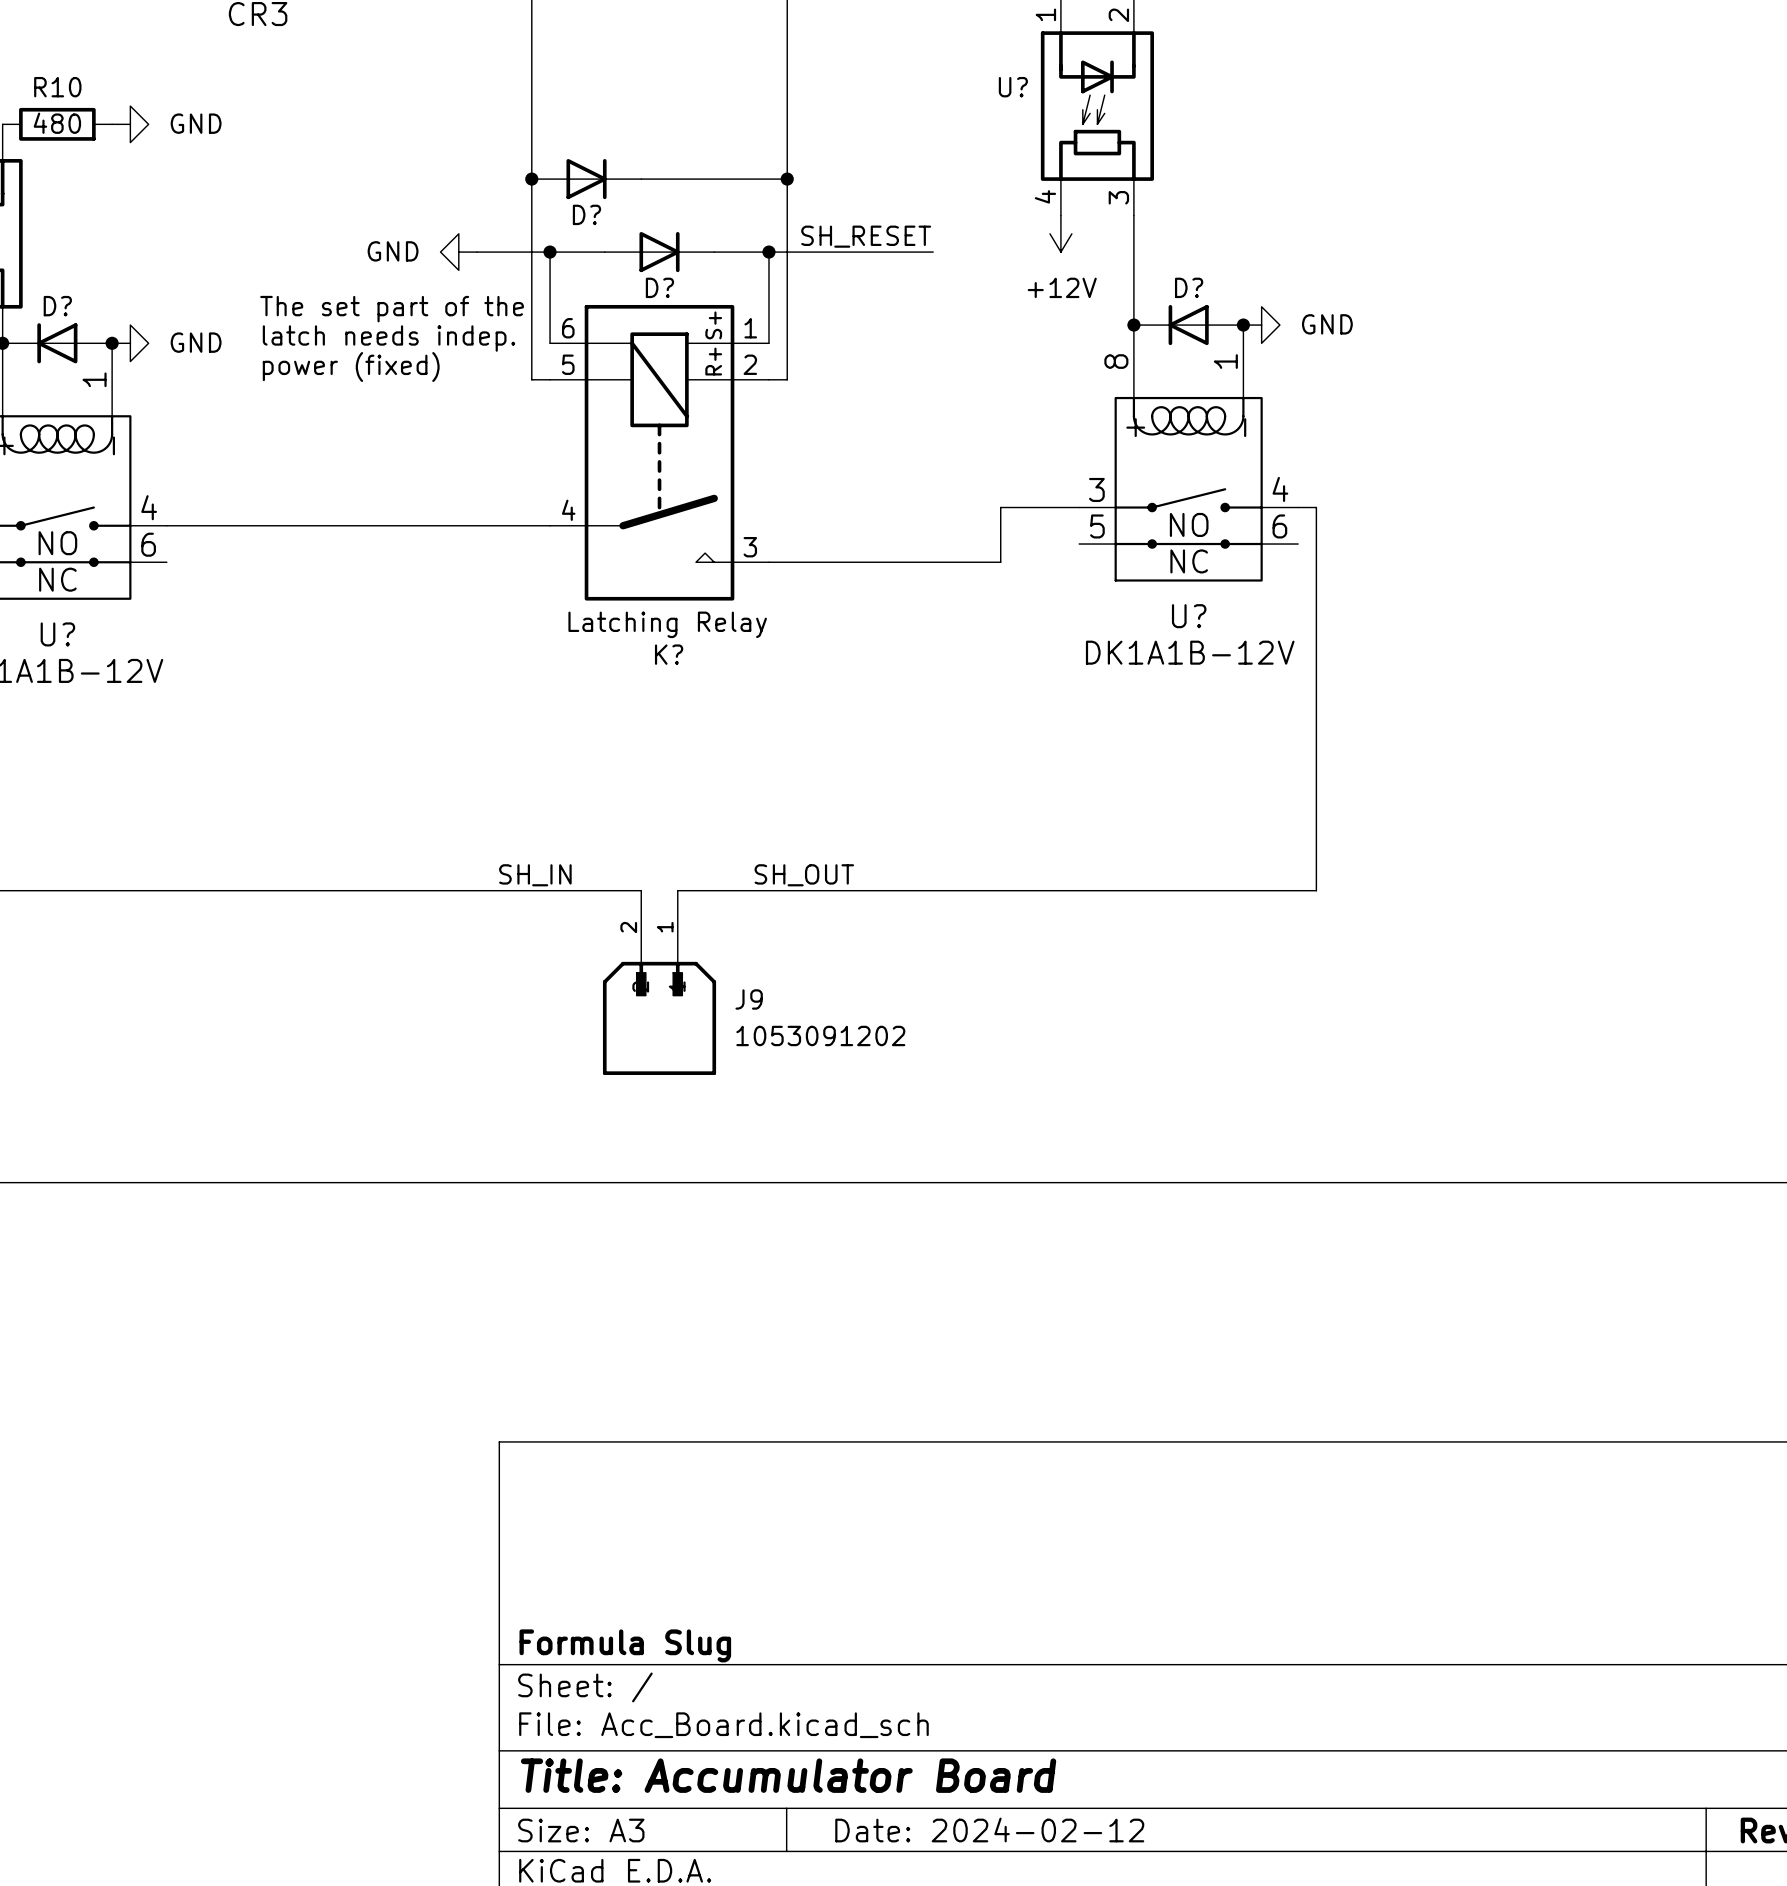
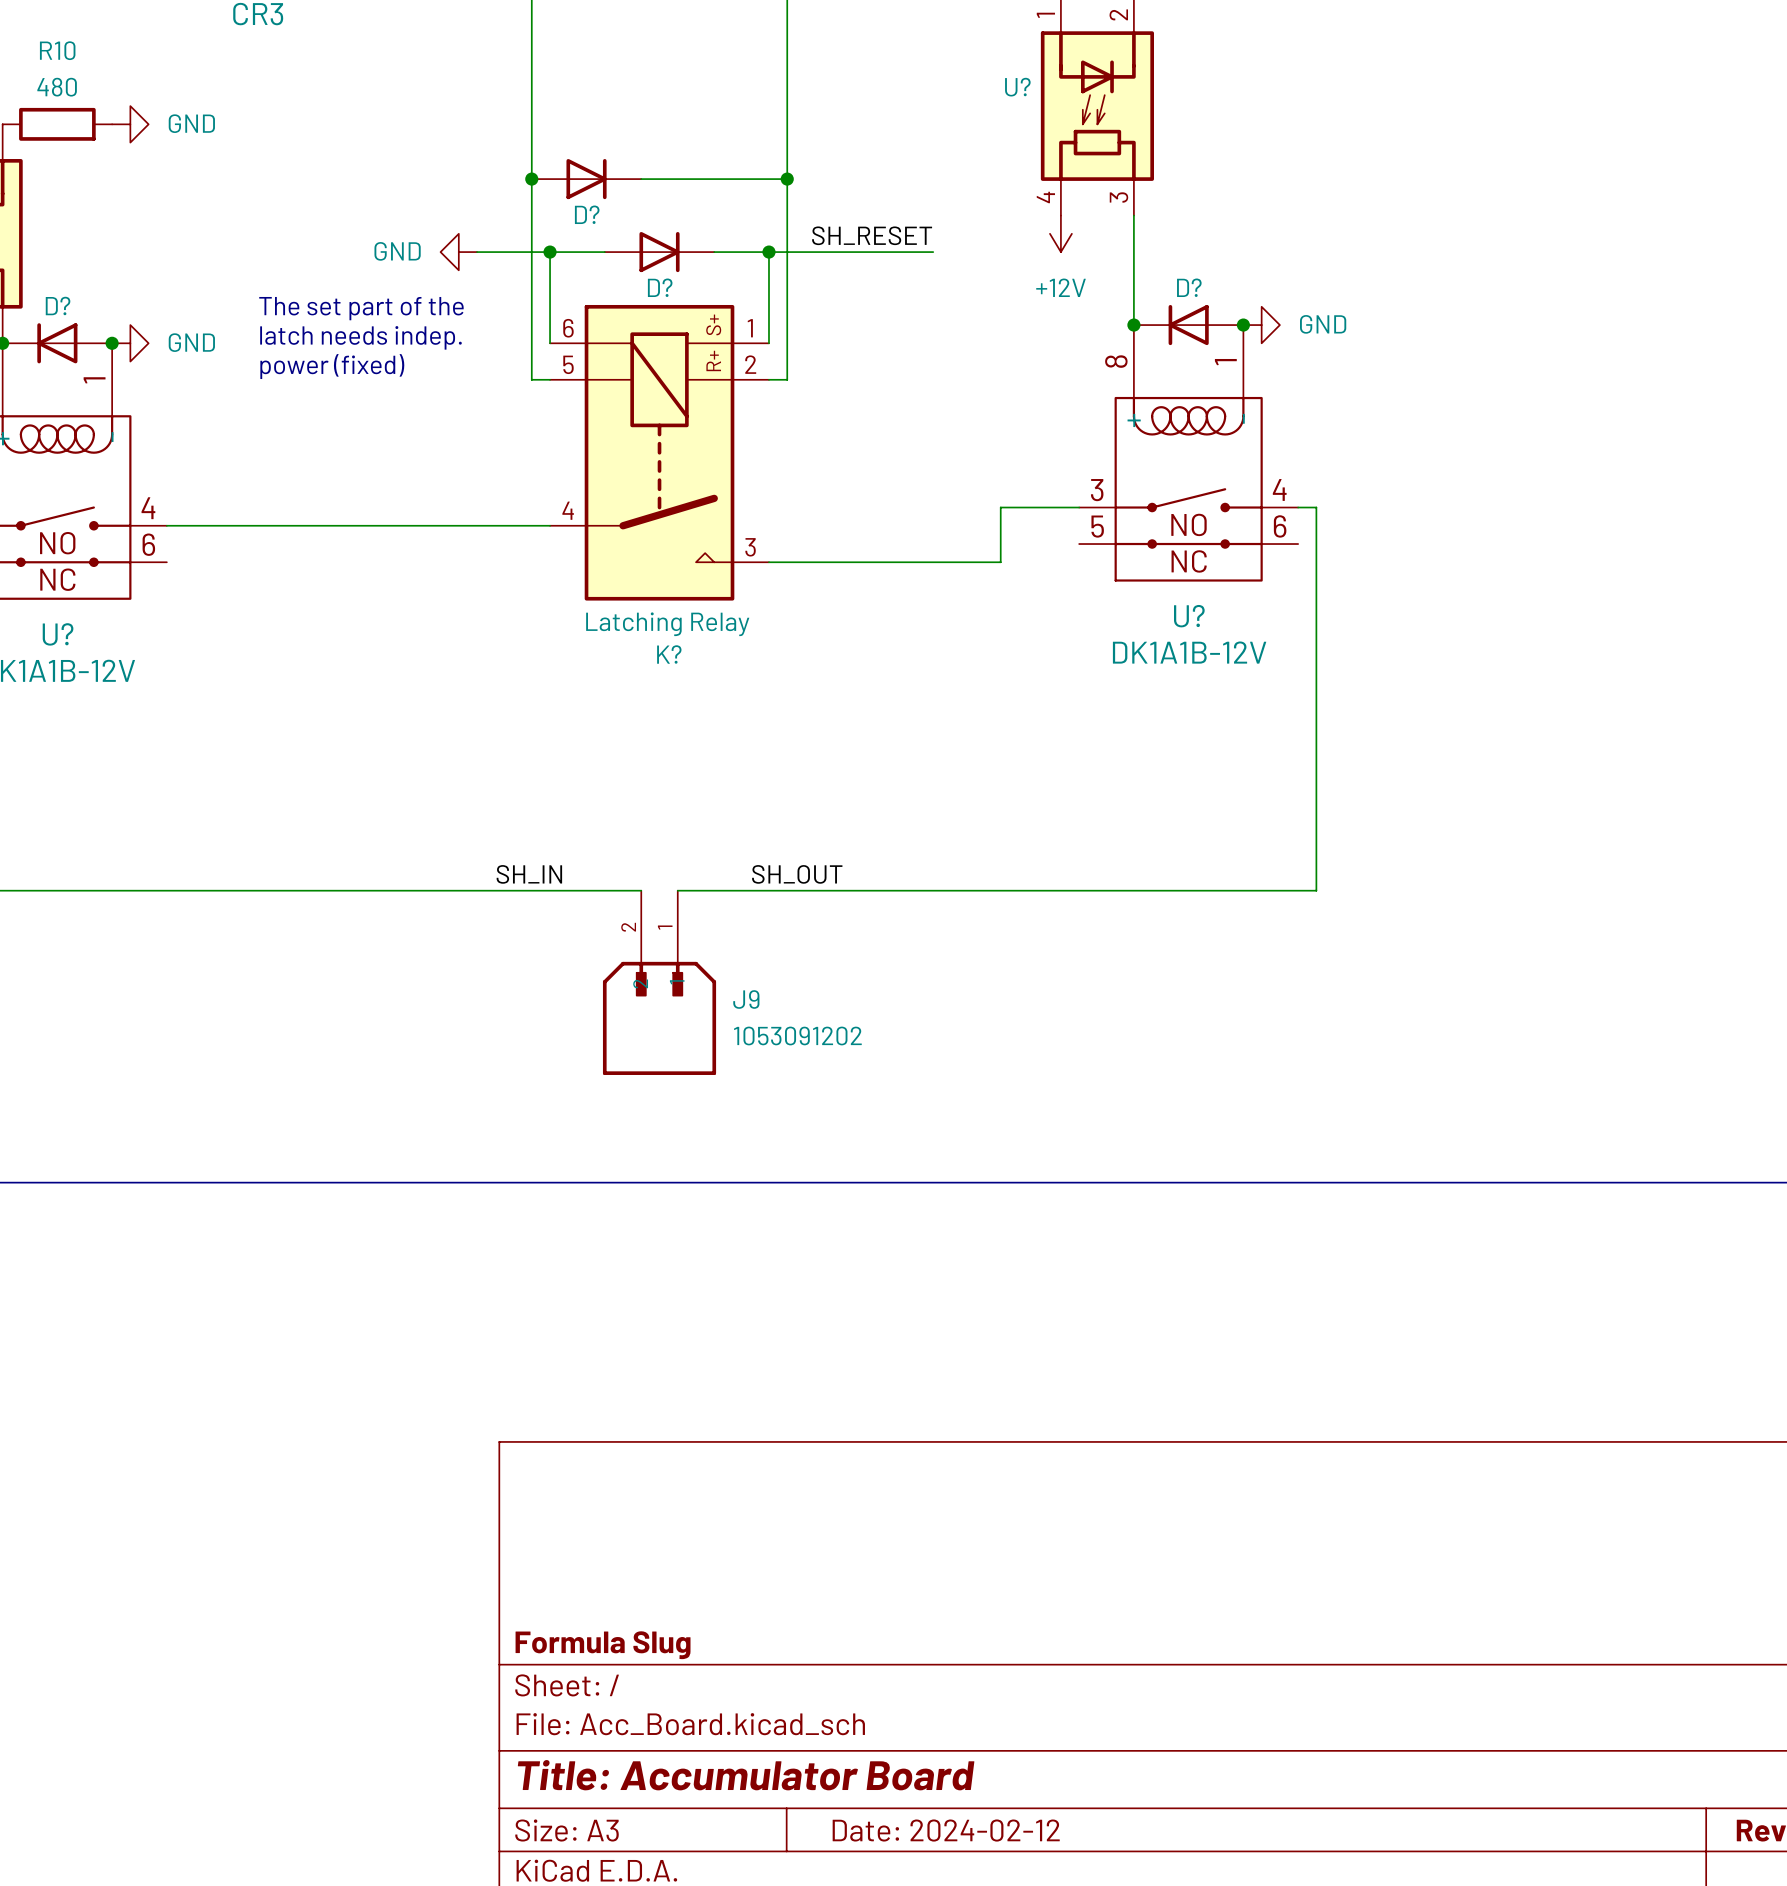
R10 name position: R10 (57, 87) -> R10 (57, 50)
R10 value position: 480 (57, 123) -> 480 (57, 87)

